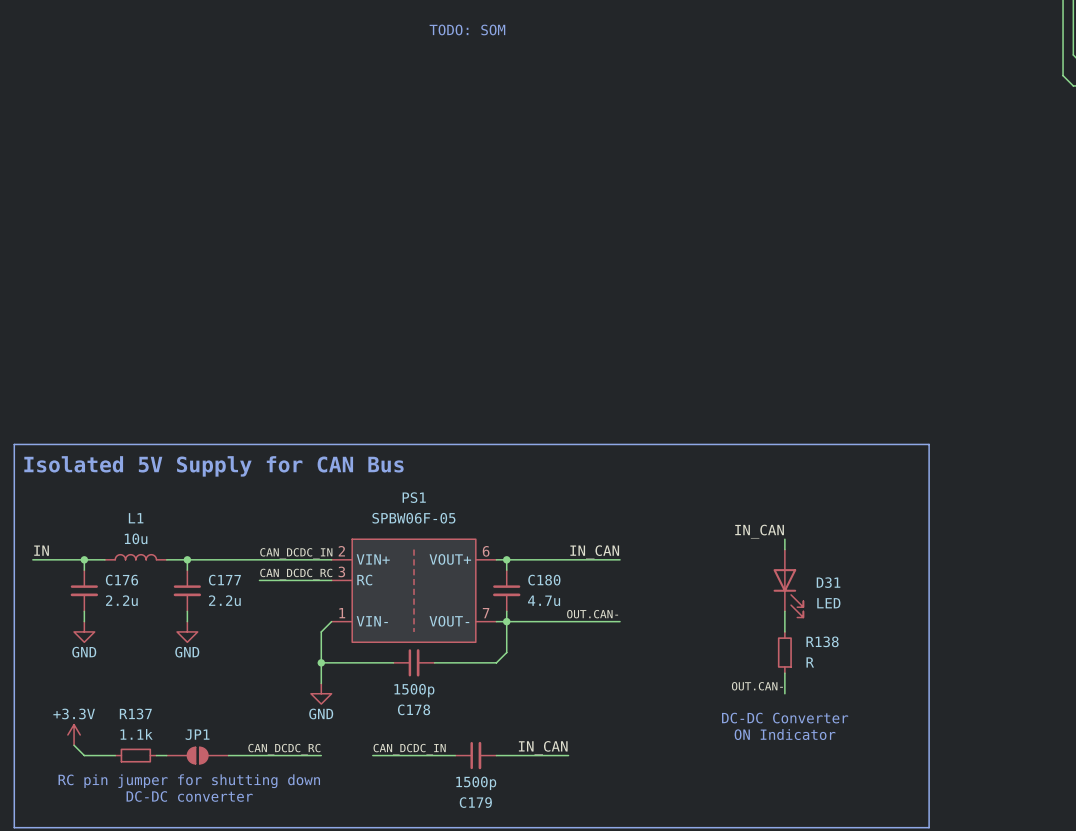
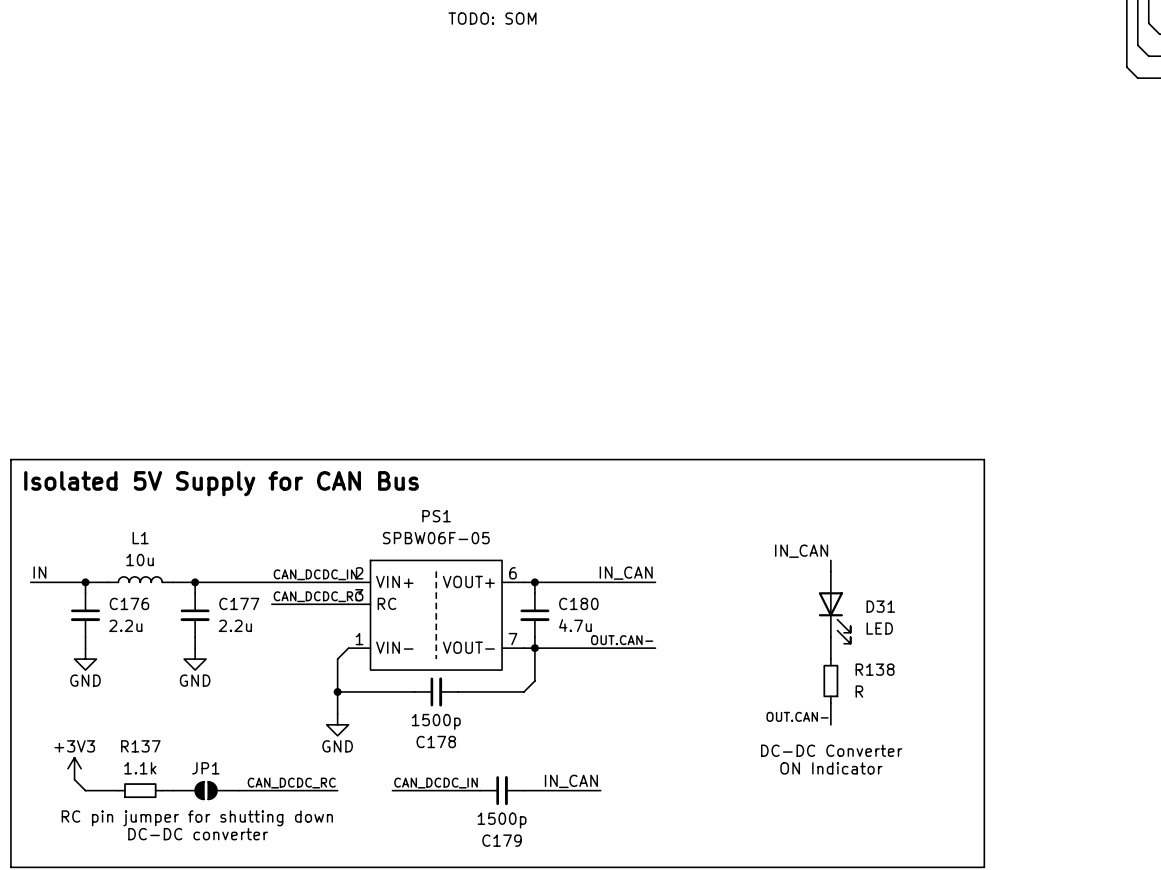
power symbol: +3.3V (74, 734) -> +3V3 (74, 768)

